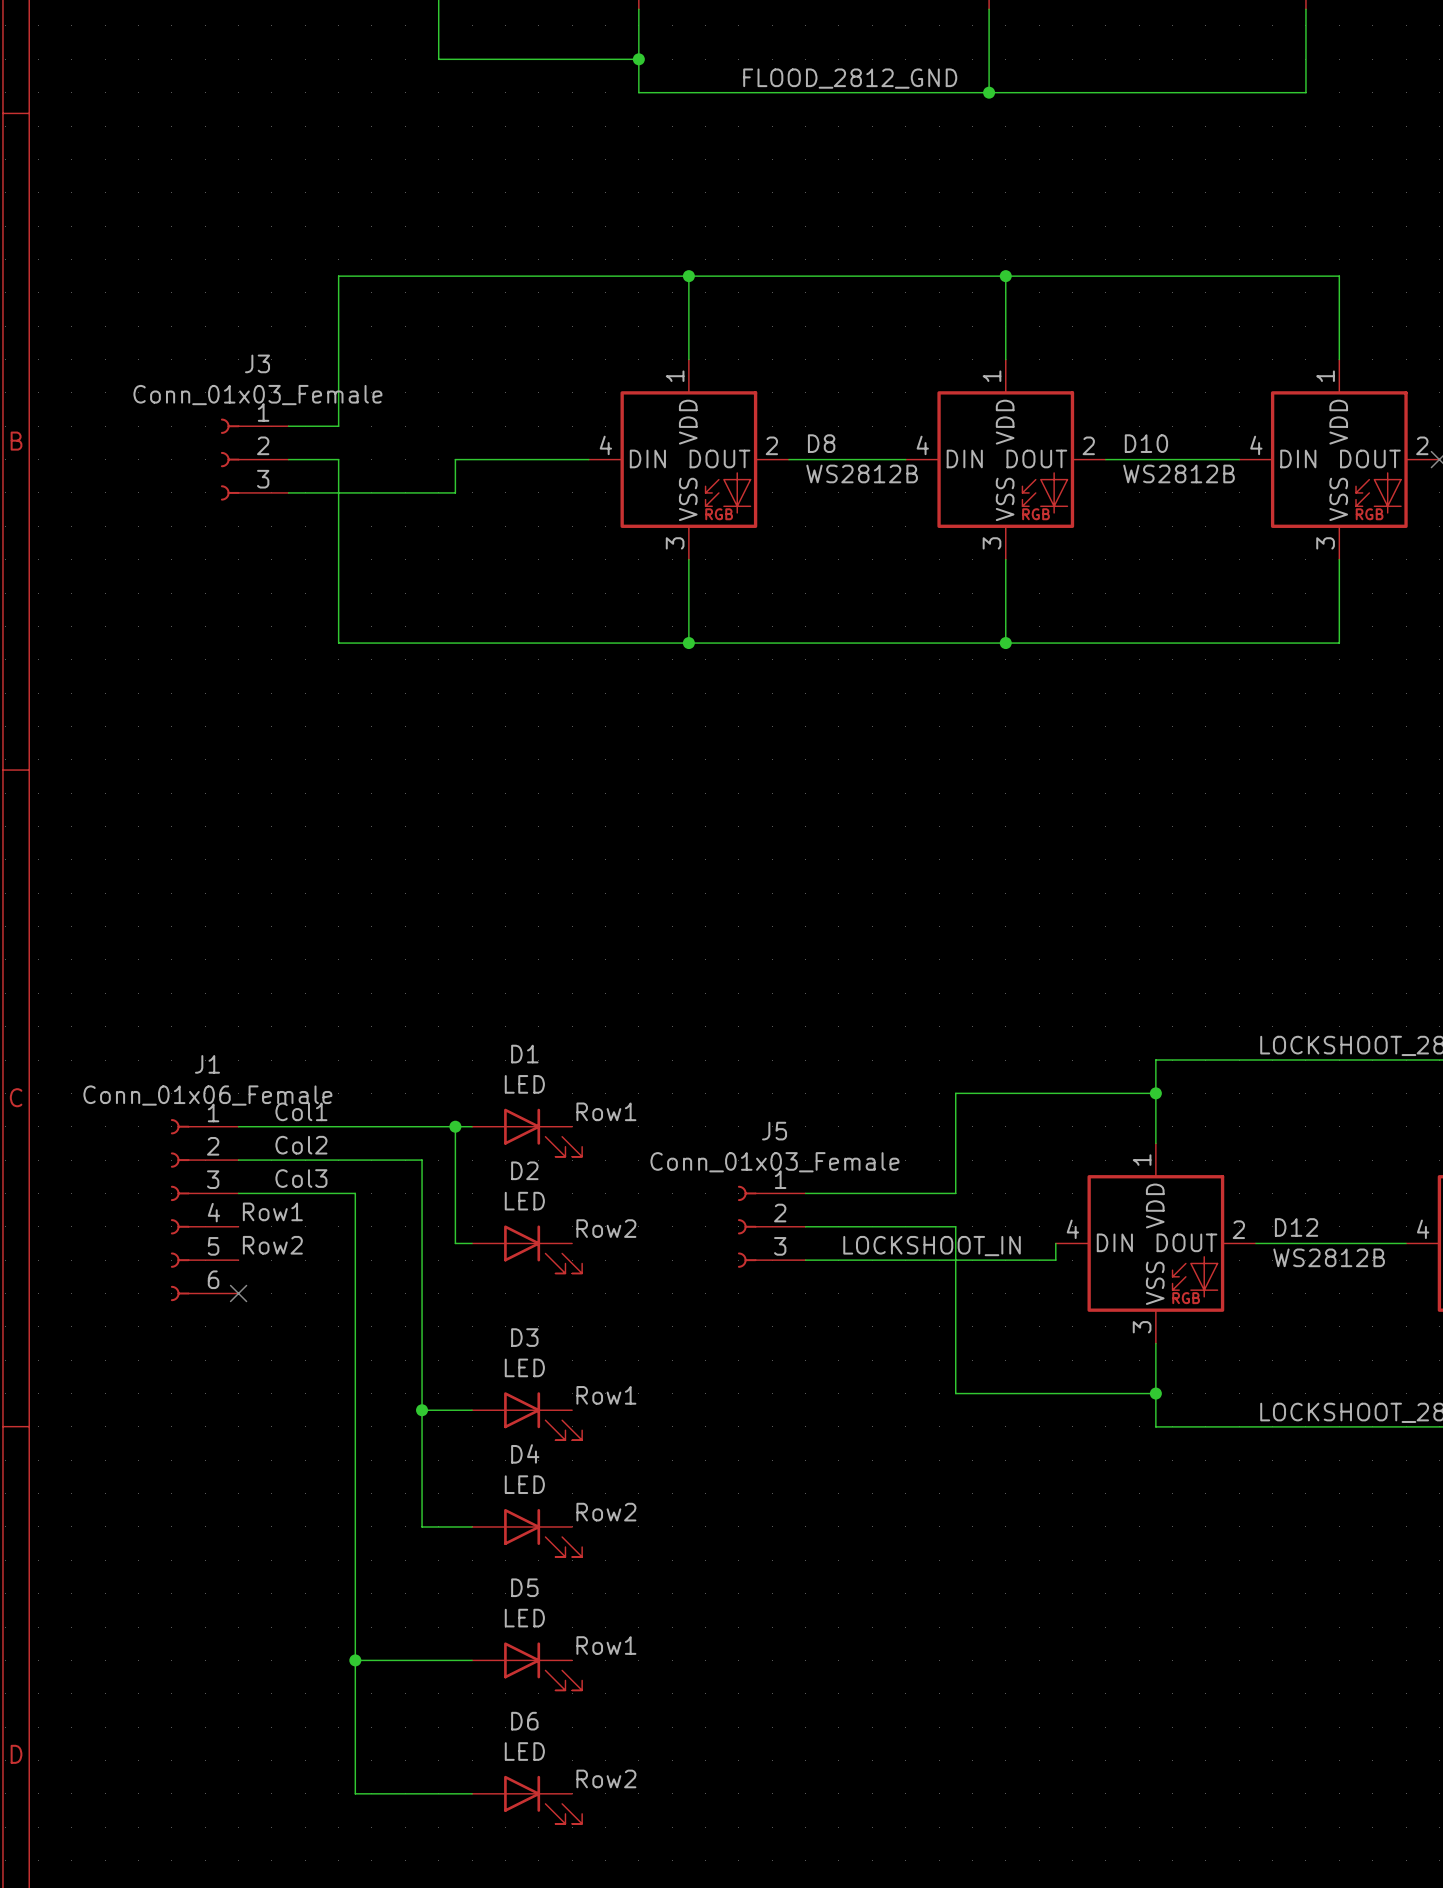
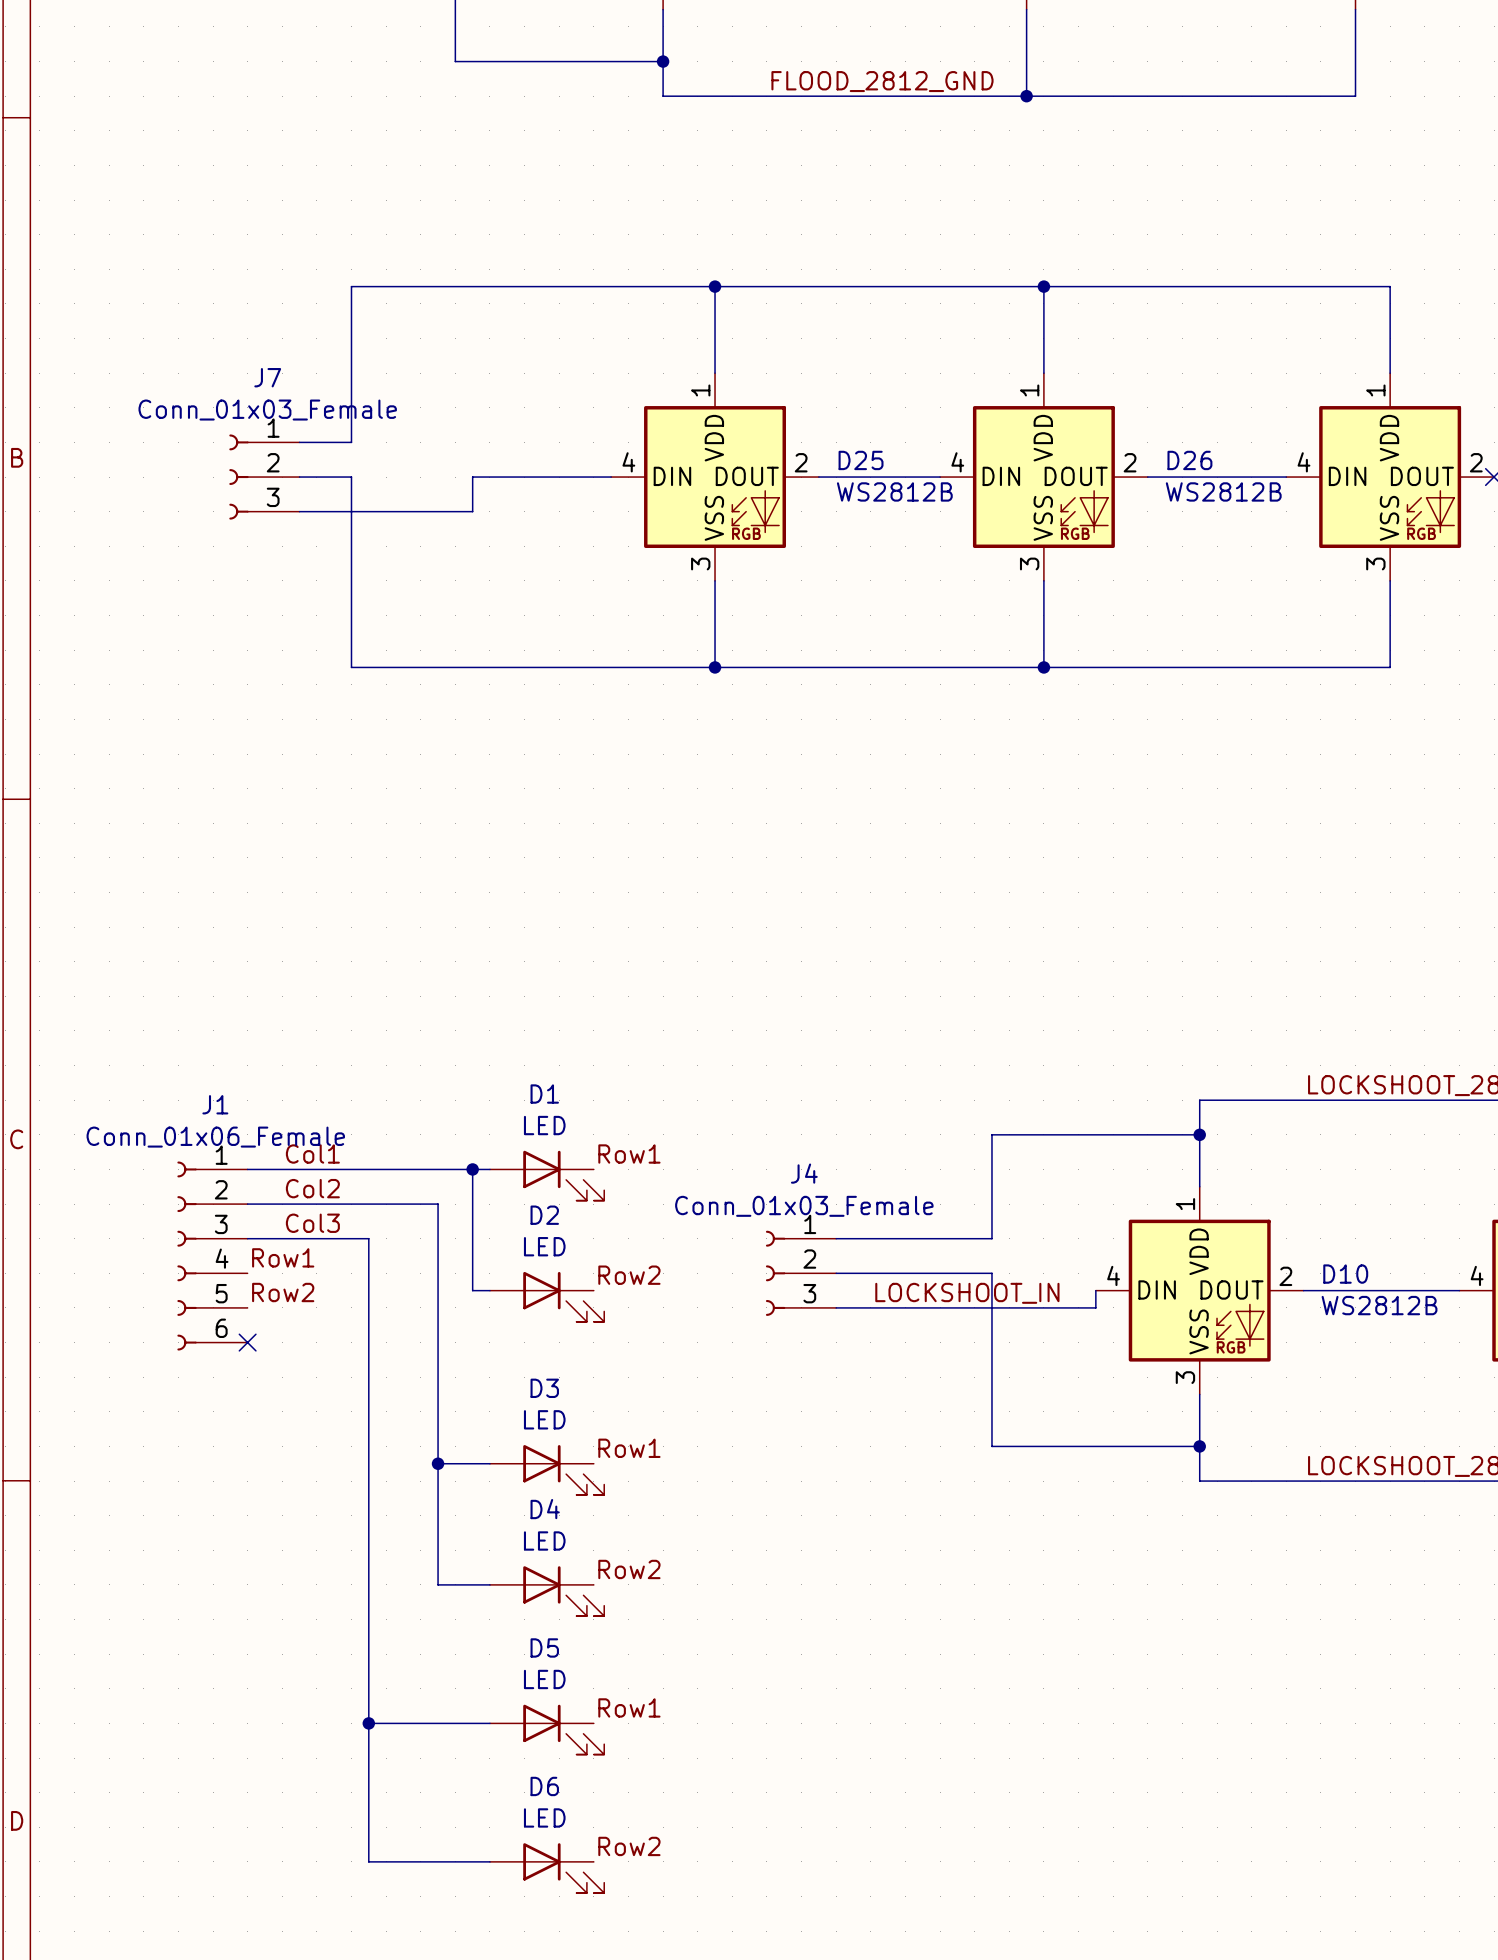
J3 name: J3 (257, 363) -> J7 (267, 377)
D8 name: D8 (821, 443) -> D25 (861, 460)
D10 name: D10 (1146, 443) -> D26 (1189, 460)
J5 name: J5 (774, 1131) -> J4 (804, 1173)
D12 name: D12 (1296, 1227) -> D10 (1345, 1274)

